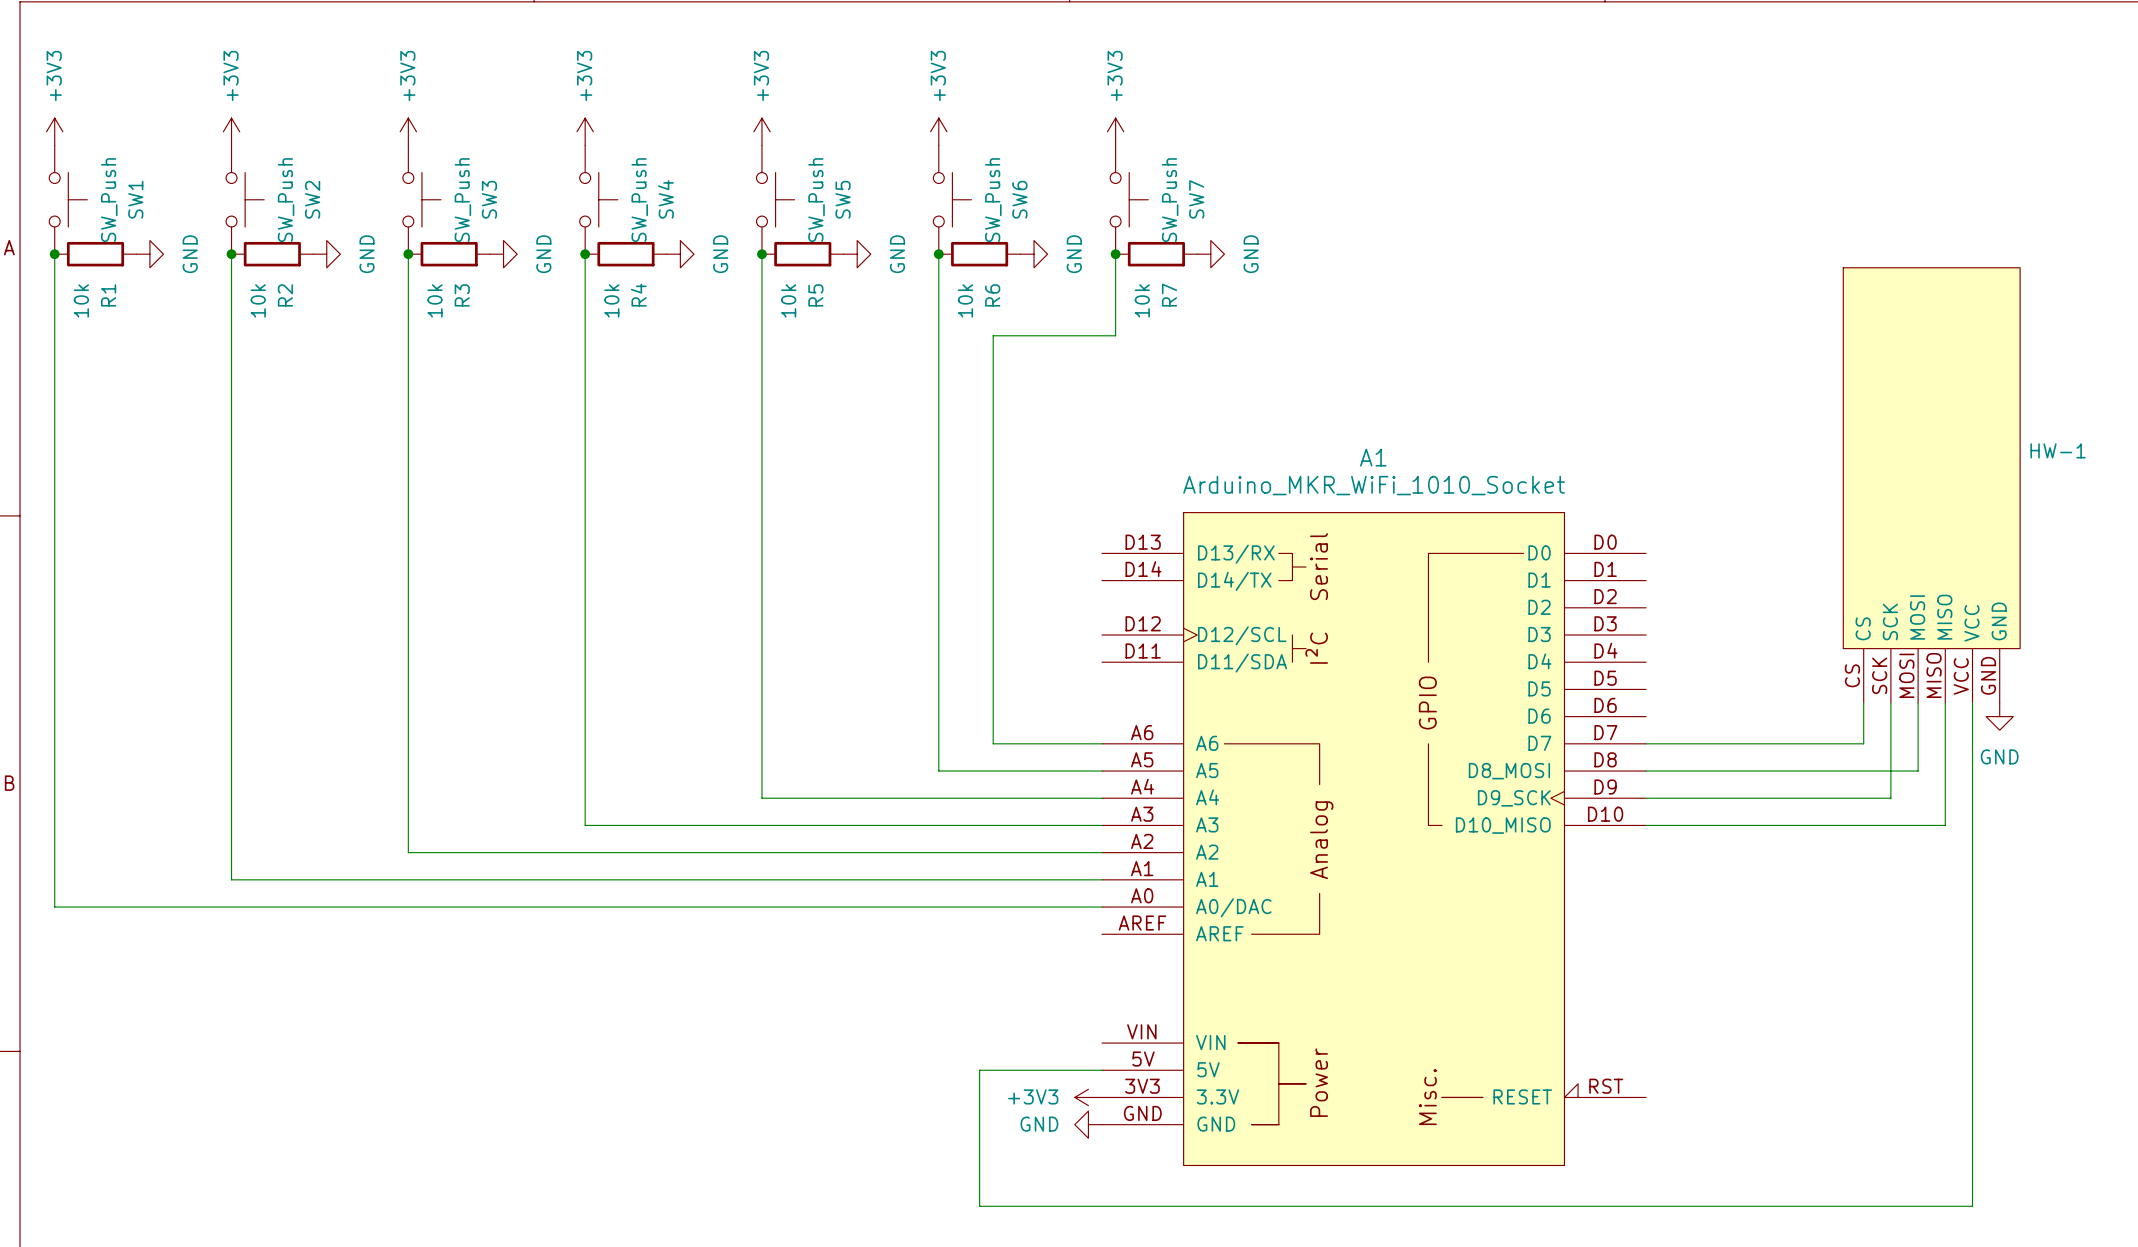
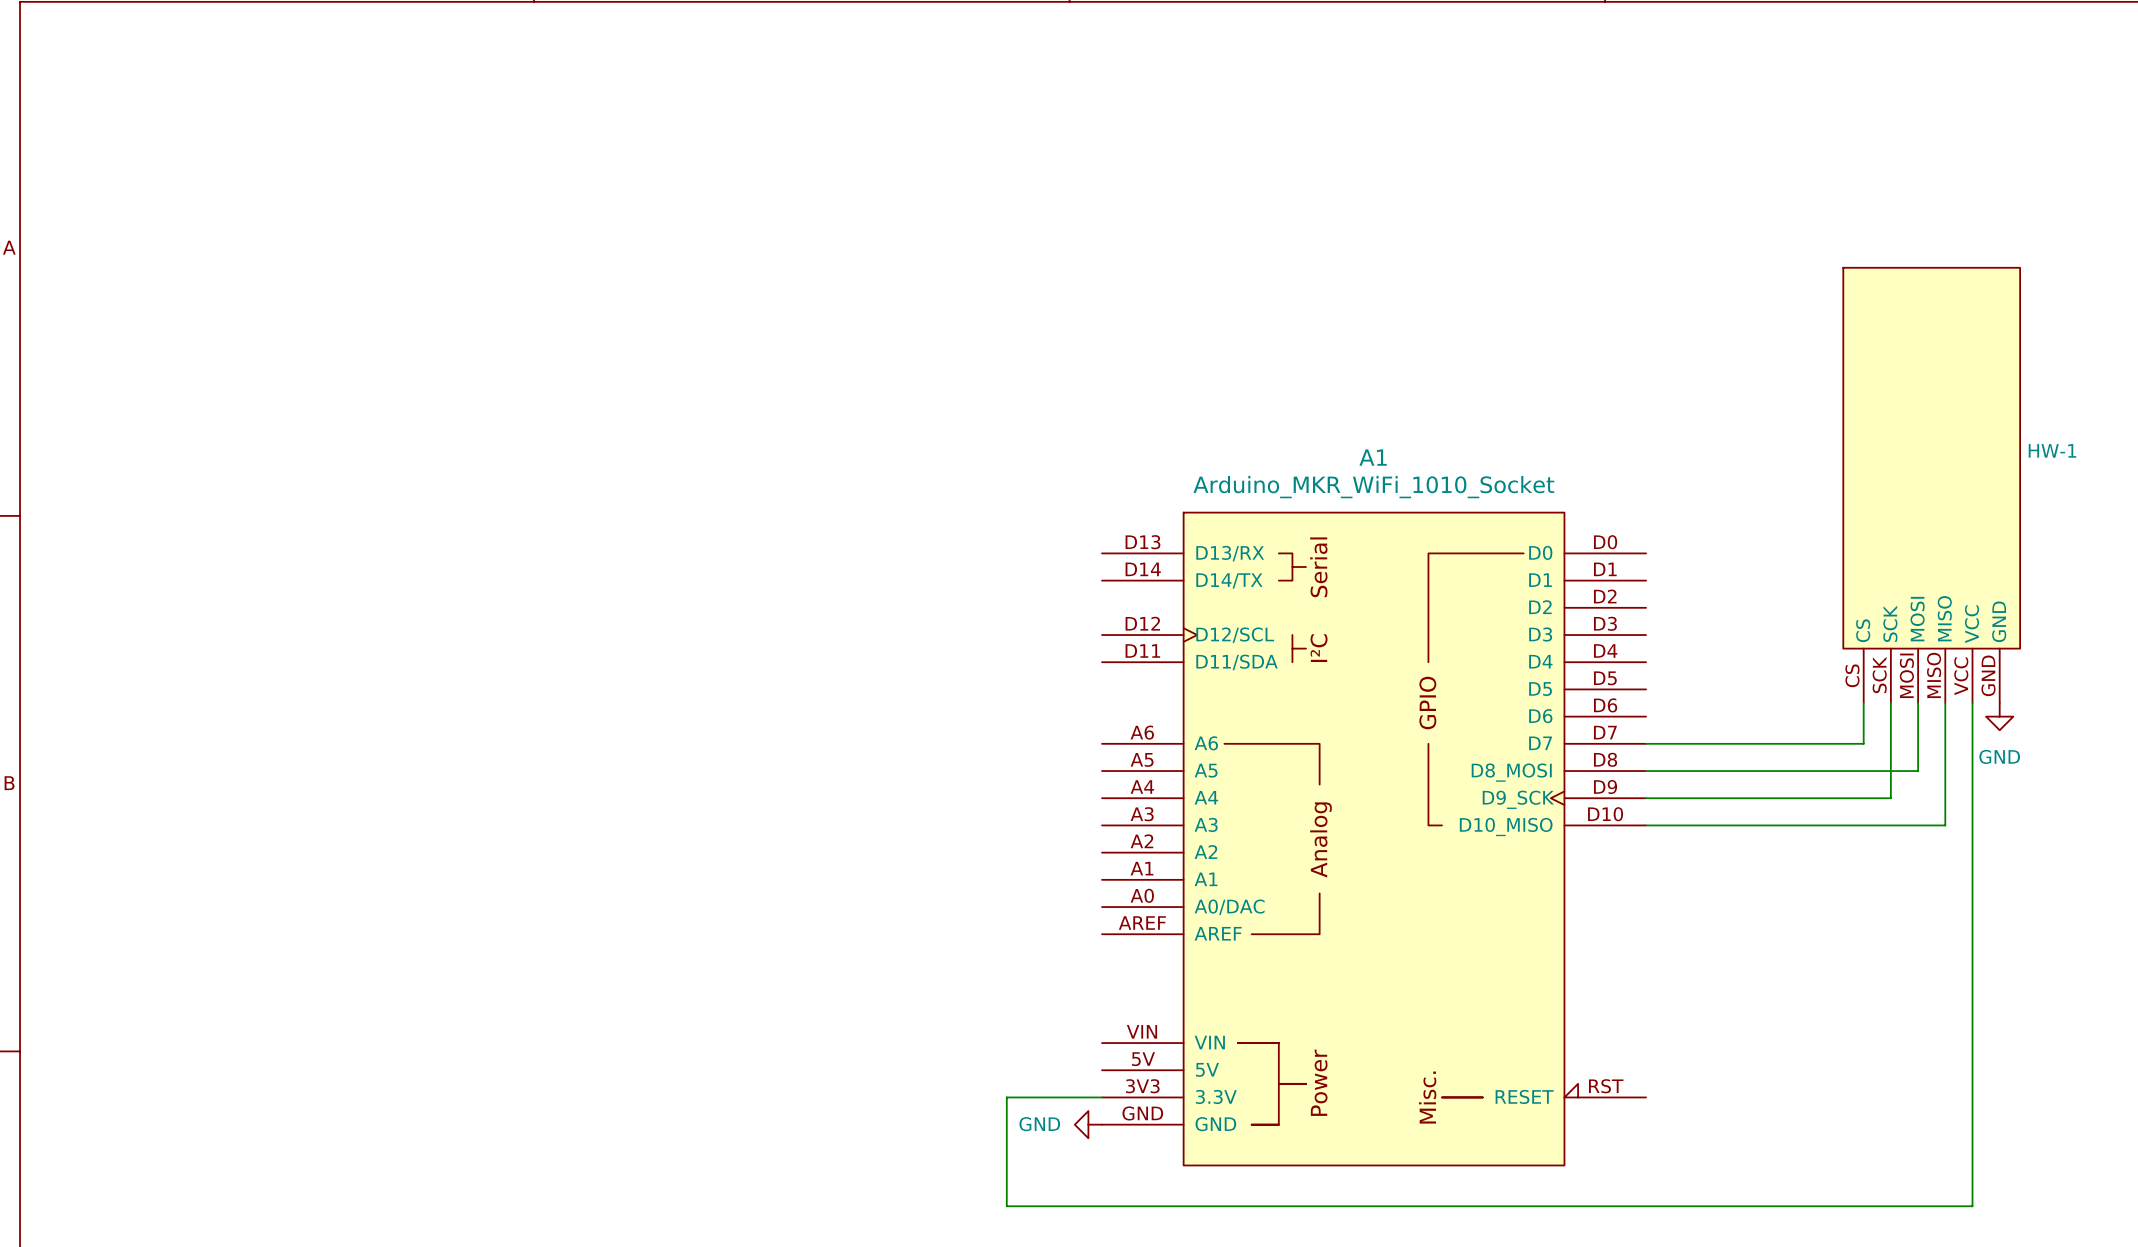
power symbol: +3V3 (54, 131) -> none
power symbol: +3V3 (231, 131) -> none
power symbol: +3V3 (408, 131) -> none
power symbol: +3V3 (585, 131) -> none
power symbol: +3V3 (761, 131) -> none
power symbol: +3V3 (938, 131) -> none
power symbol: +3V3 (1115, 131) -> none
SW1: SW_Push (68, 199) -> none
SW2: SW_Push (245, 199) -> none
SW3: SW_Push (421, 199) -> none
SW4: SW_Push (598, 199) -> none
SW5: SW_Push (775, 199) -> none
SW6: SW_Push (952, 199) -> none
SW7: SW_Push (1129, 199) -> none
wire: (54, 254) (54, 907) (1102, 907) -> none
junction: (54, 254) -> none
R1: 10k (95, 254) -> none
power symbol: GND (149, 254) -> none
wire: (231, 254) (231, 879) (1102, 879) -> none
junction: (231, 254) -> none
R2: 10k (272, 254) -> none
power symbol: GND (326, 254) -> none
wire: (408, 254) (408, 852) (1102, 852) -> none
junction: (408, 254) -> none
R3: 10k (449, 254) -> none
power symbol: GND (503, 254) -> none
wire: (585, 254) (585, 825) (1102, 825) -> none
junction: (585, 254) -> none
R4: 10k (625, 254) -> none
power symbol: GND (680, 254) -> none
wire: (761, 254) (761, 798) (1102, 798) -> none
junction: (761, 254) -> none
R5: 10k (802, 254) -> none
power symbol: GND (857, 254) -> none
wire: (938, 254) (938, 771) (1102, 771) -> none
junction: (938, 254) -> none
R6: 10k (979, 254) -> none
power symbol: GND (1034, 254) -> none
wire: (1115, 254) (1115, 335) (993, 335) (993, 743) (1102, 743) -> none
junction: (1115, 254) -> none
R7: 10k (1156, 254) -> none
power symbol: GND (1210, 254) -> none
wire: (1102, 1070) (979, 1070) (979, 1206) (1006, 1206) -> (1102, 1097) (1006, 1097) (1006, 1206)
power symbol: +3V3 (1088, 1097) -> none

